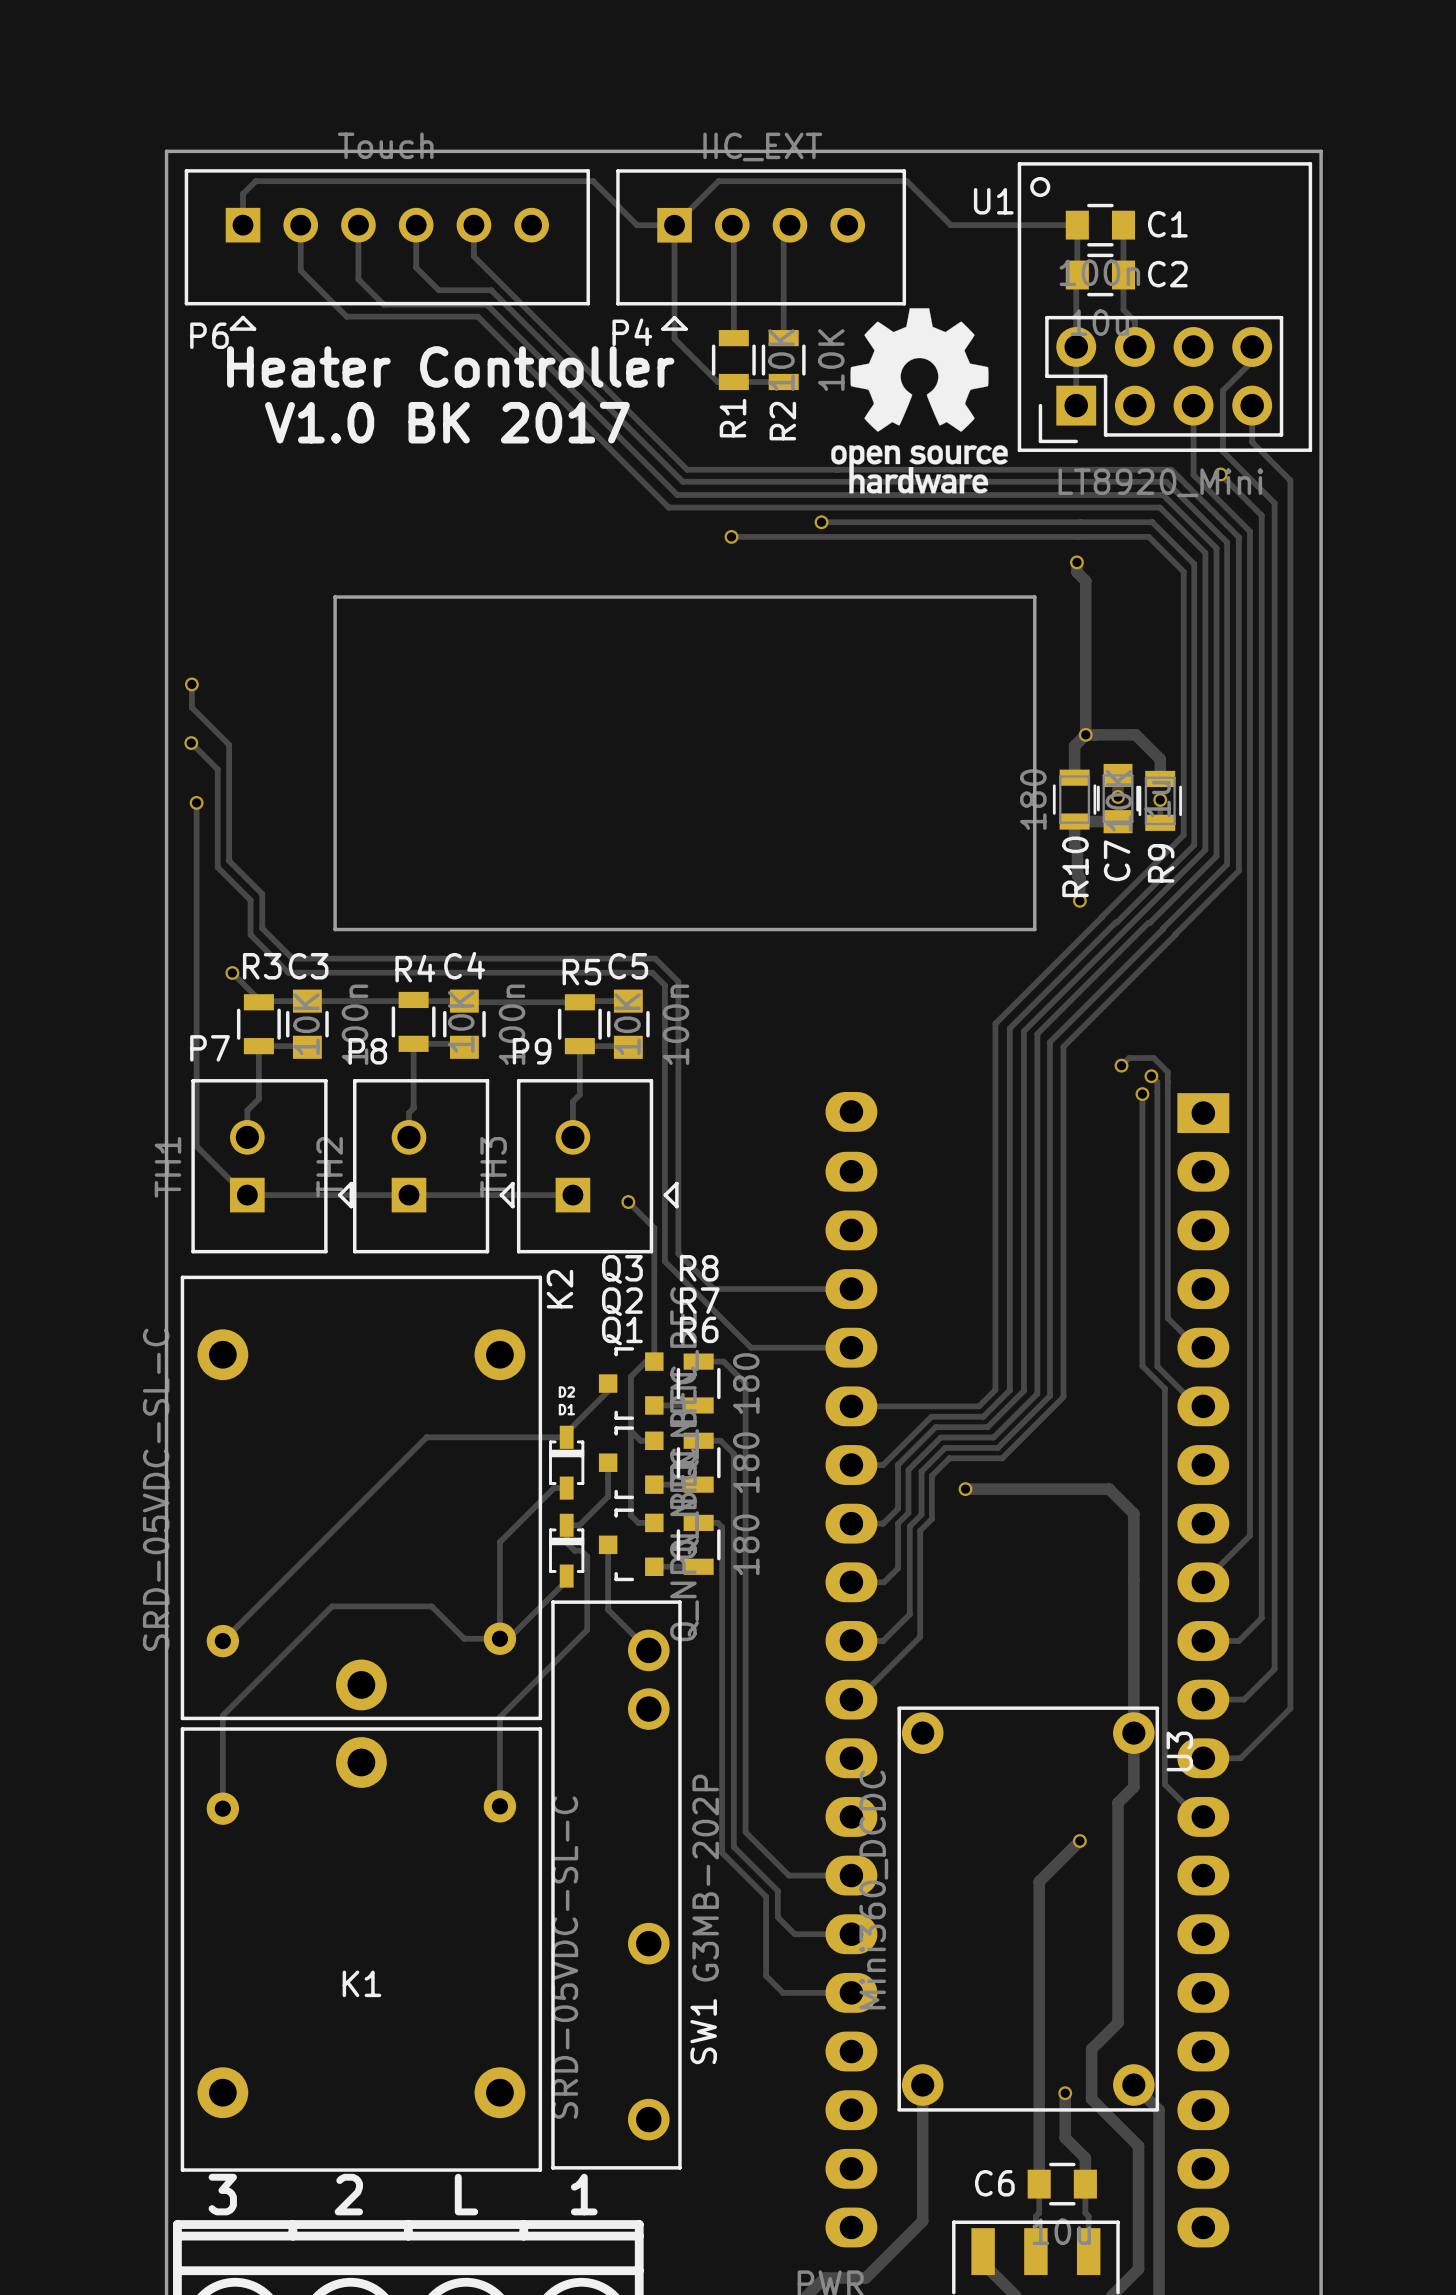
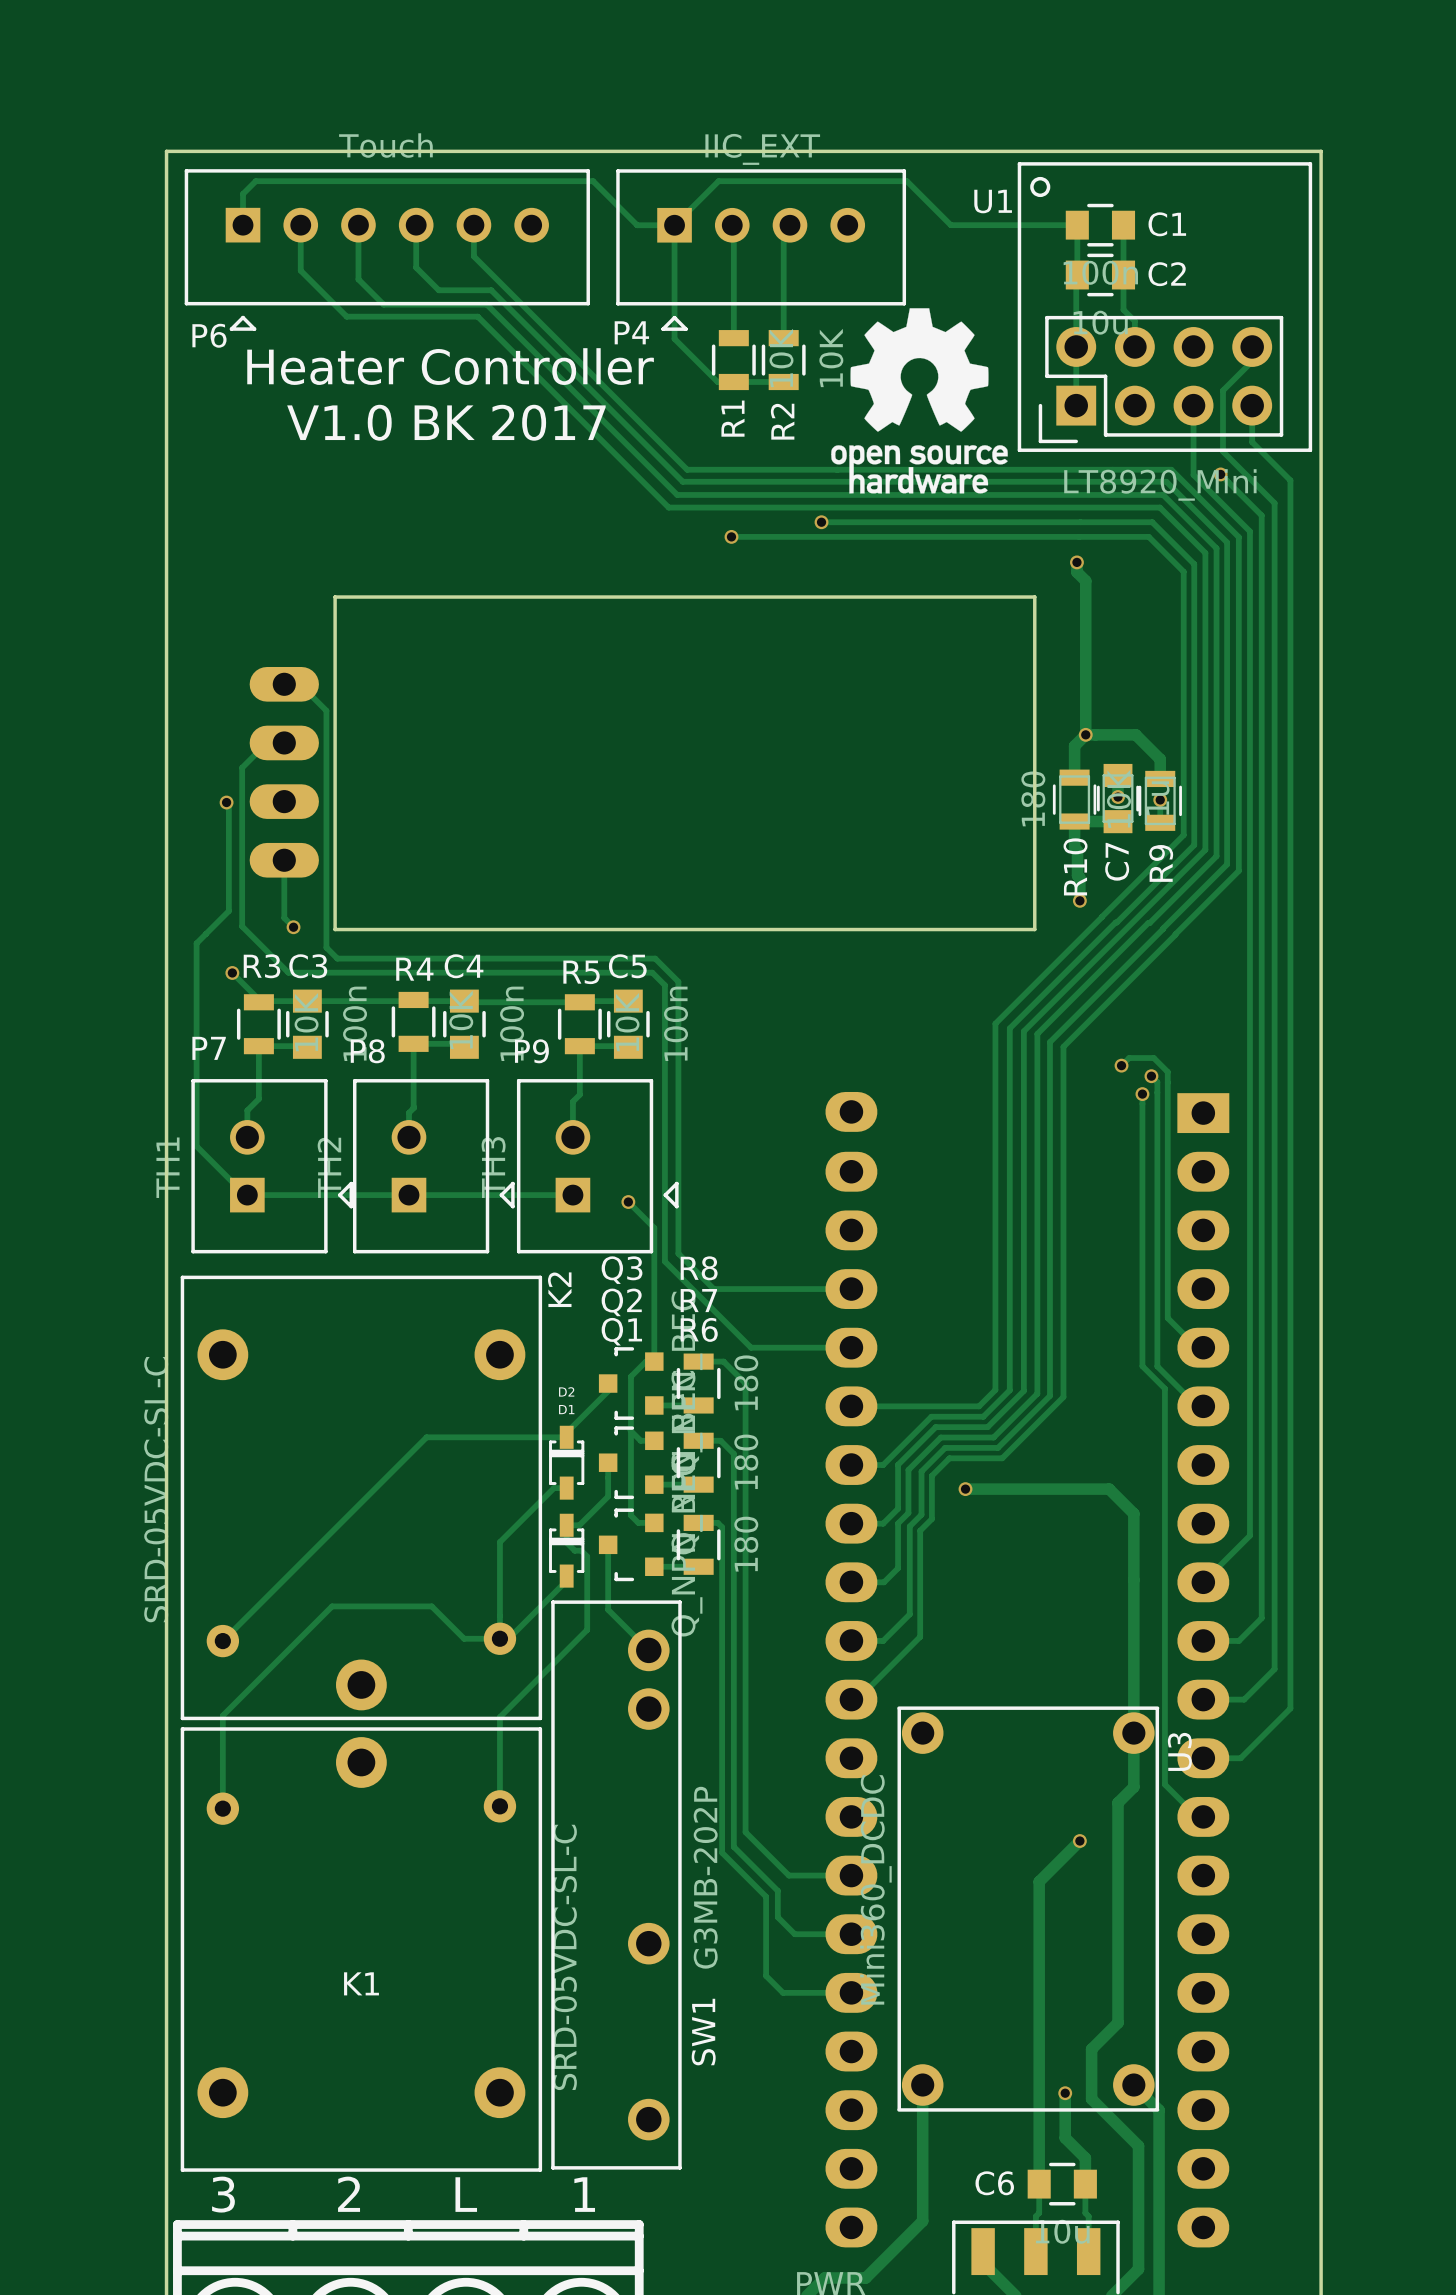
track: (191, 684) (191, 707) (229, 744) (229, 860) (262, 894) (262, 928) (292, 958) (337, 958) -> (284, 684) (300, 684) (326, 710) (326, 947) (337, 958)
via: (191, 684) -> none
track: (191, 743) (217, 769) (217, 867) (250, 900) (250, 934) -> (284, 742) (266, 742) (242, 767) (242, 926) (250, 934)
via: (191, 743) -> none
part: none -> (284, 772)
track: (196, 802) (196, 943) -> (226, 802) (228, 804) (228, 911) (196, 943)
via position: (196, 802) -> (226, 802)
track: none -> (284, 860) (284, 917) (293, 927)
via: none -> (293, 927)

